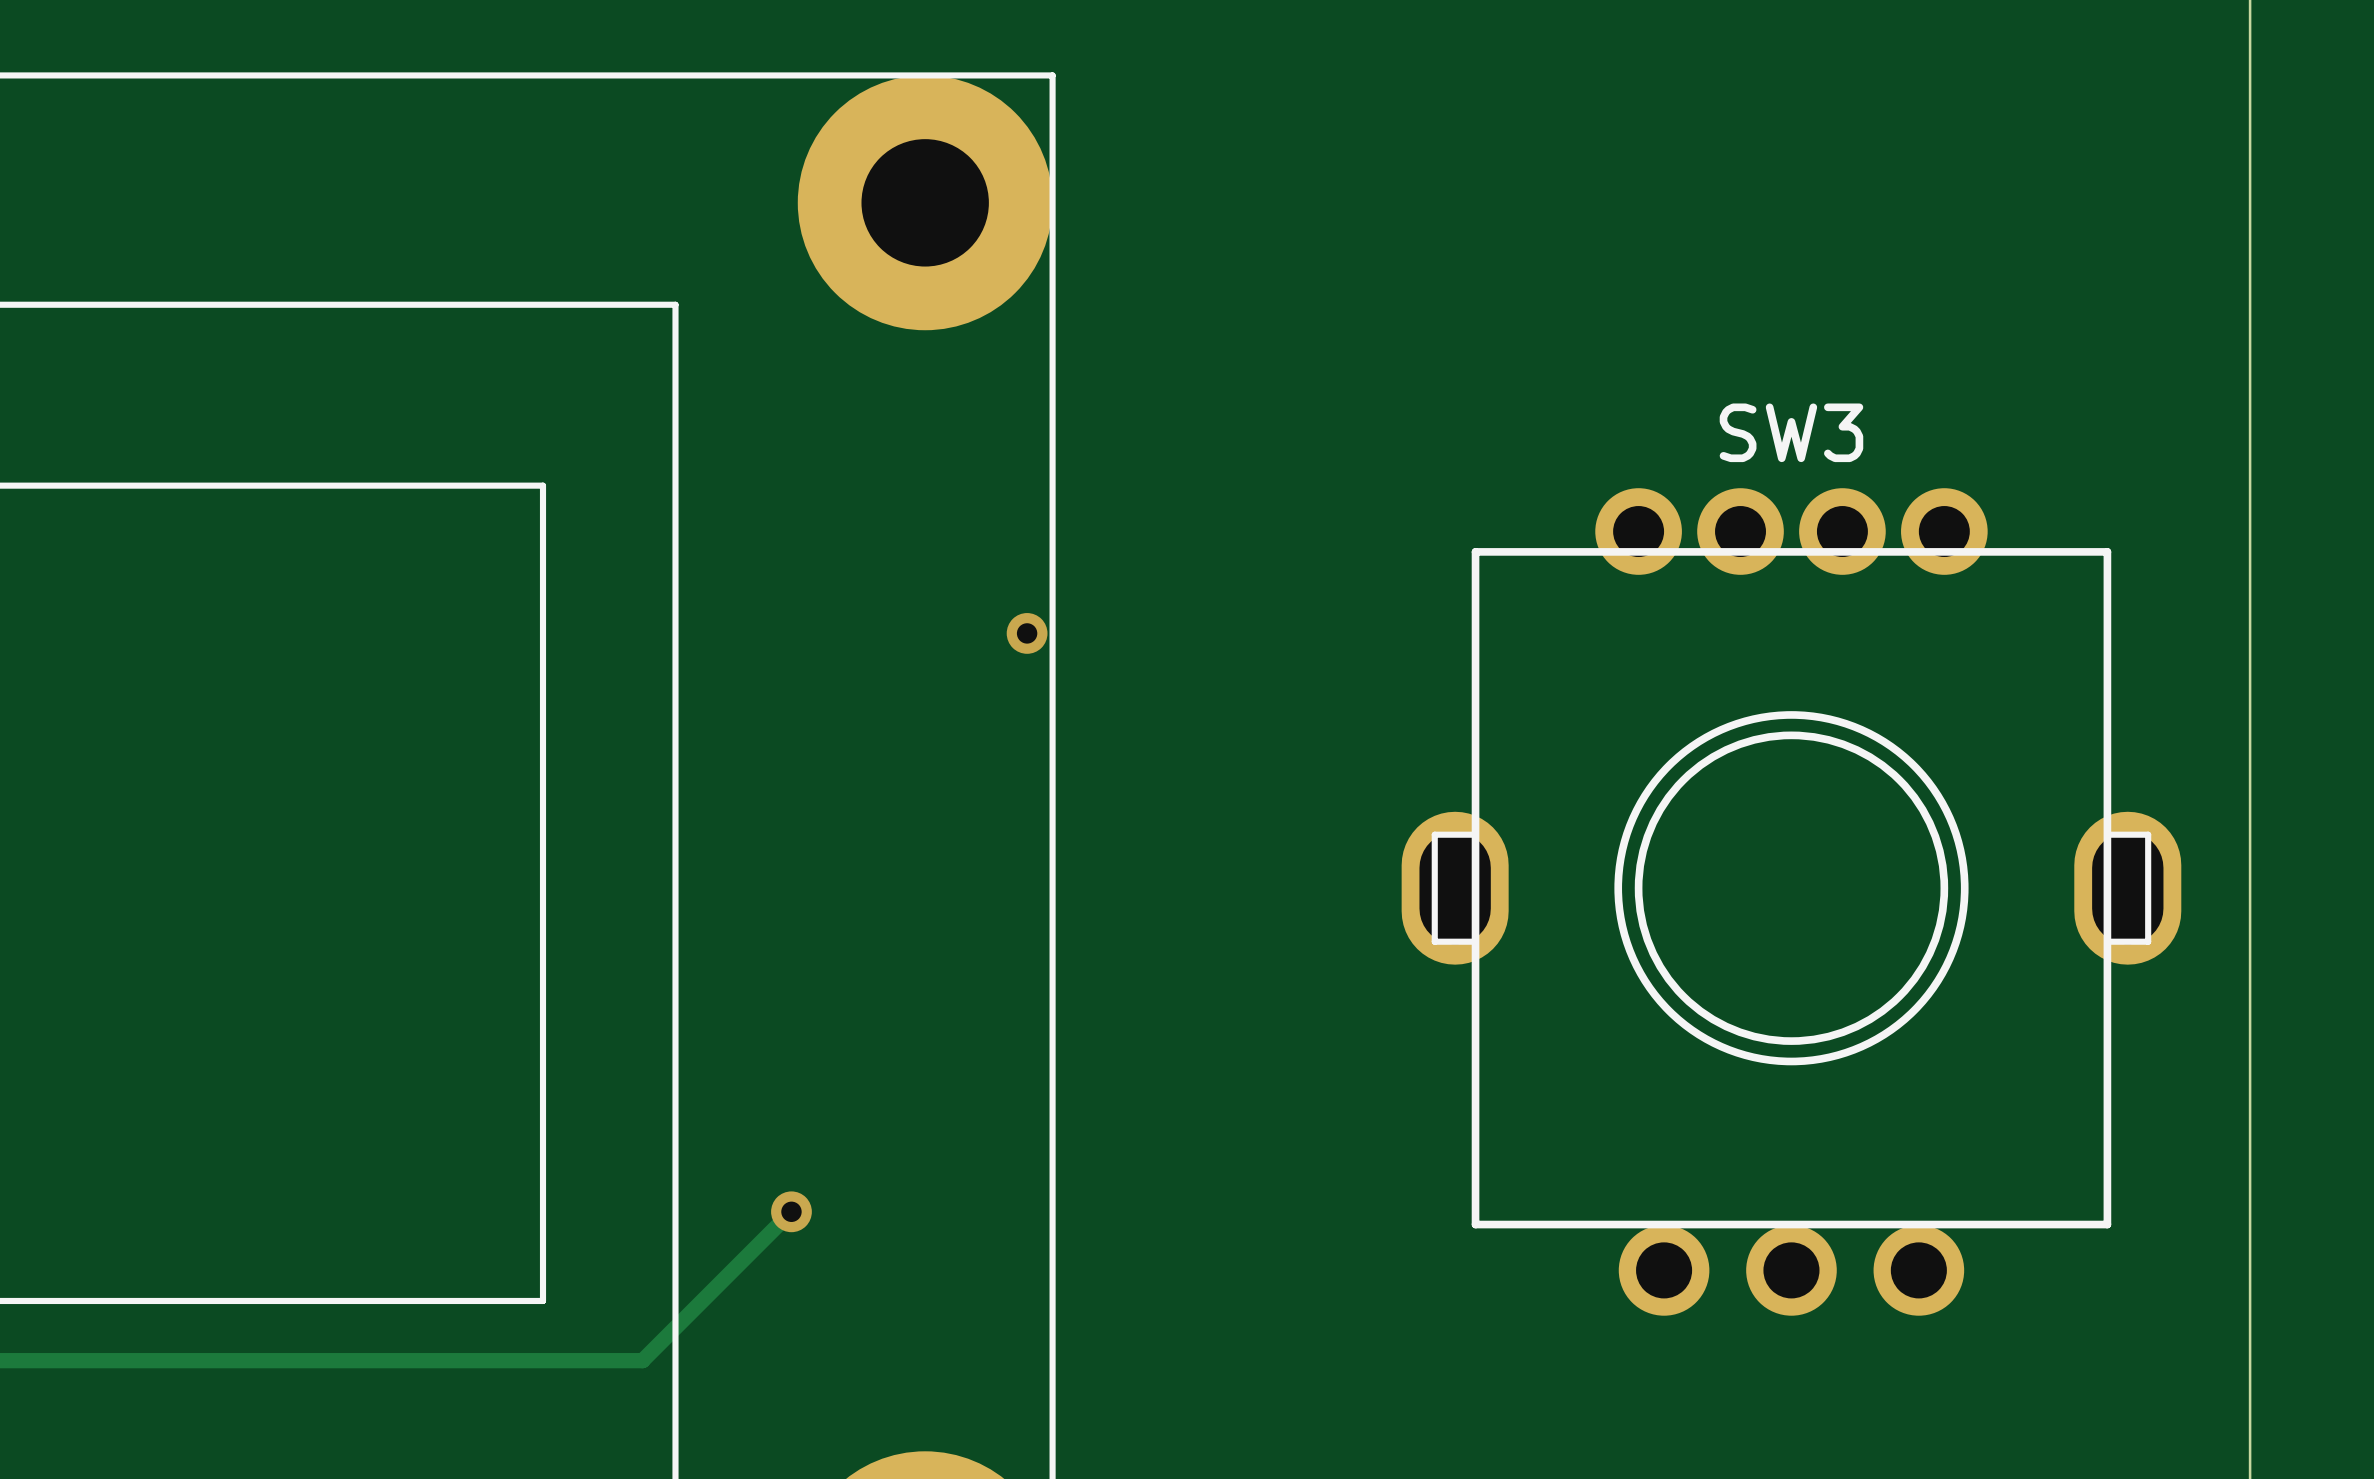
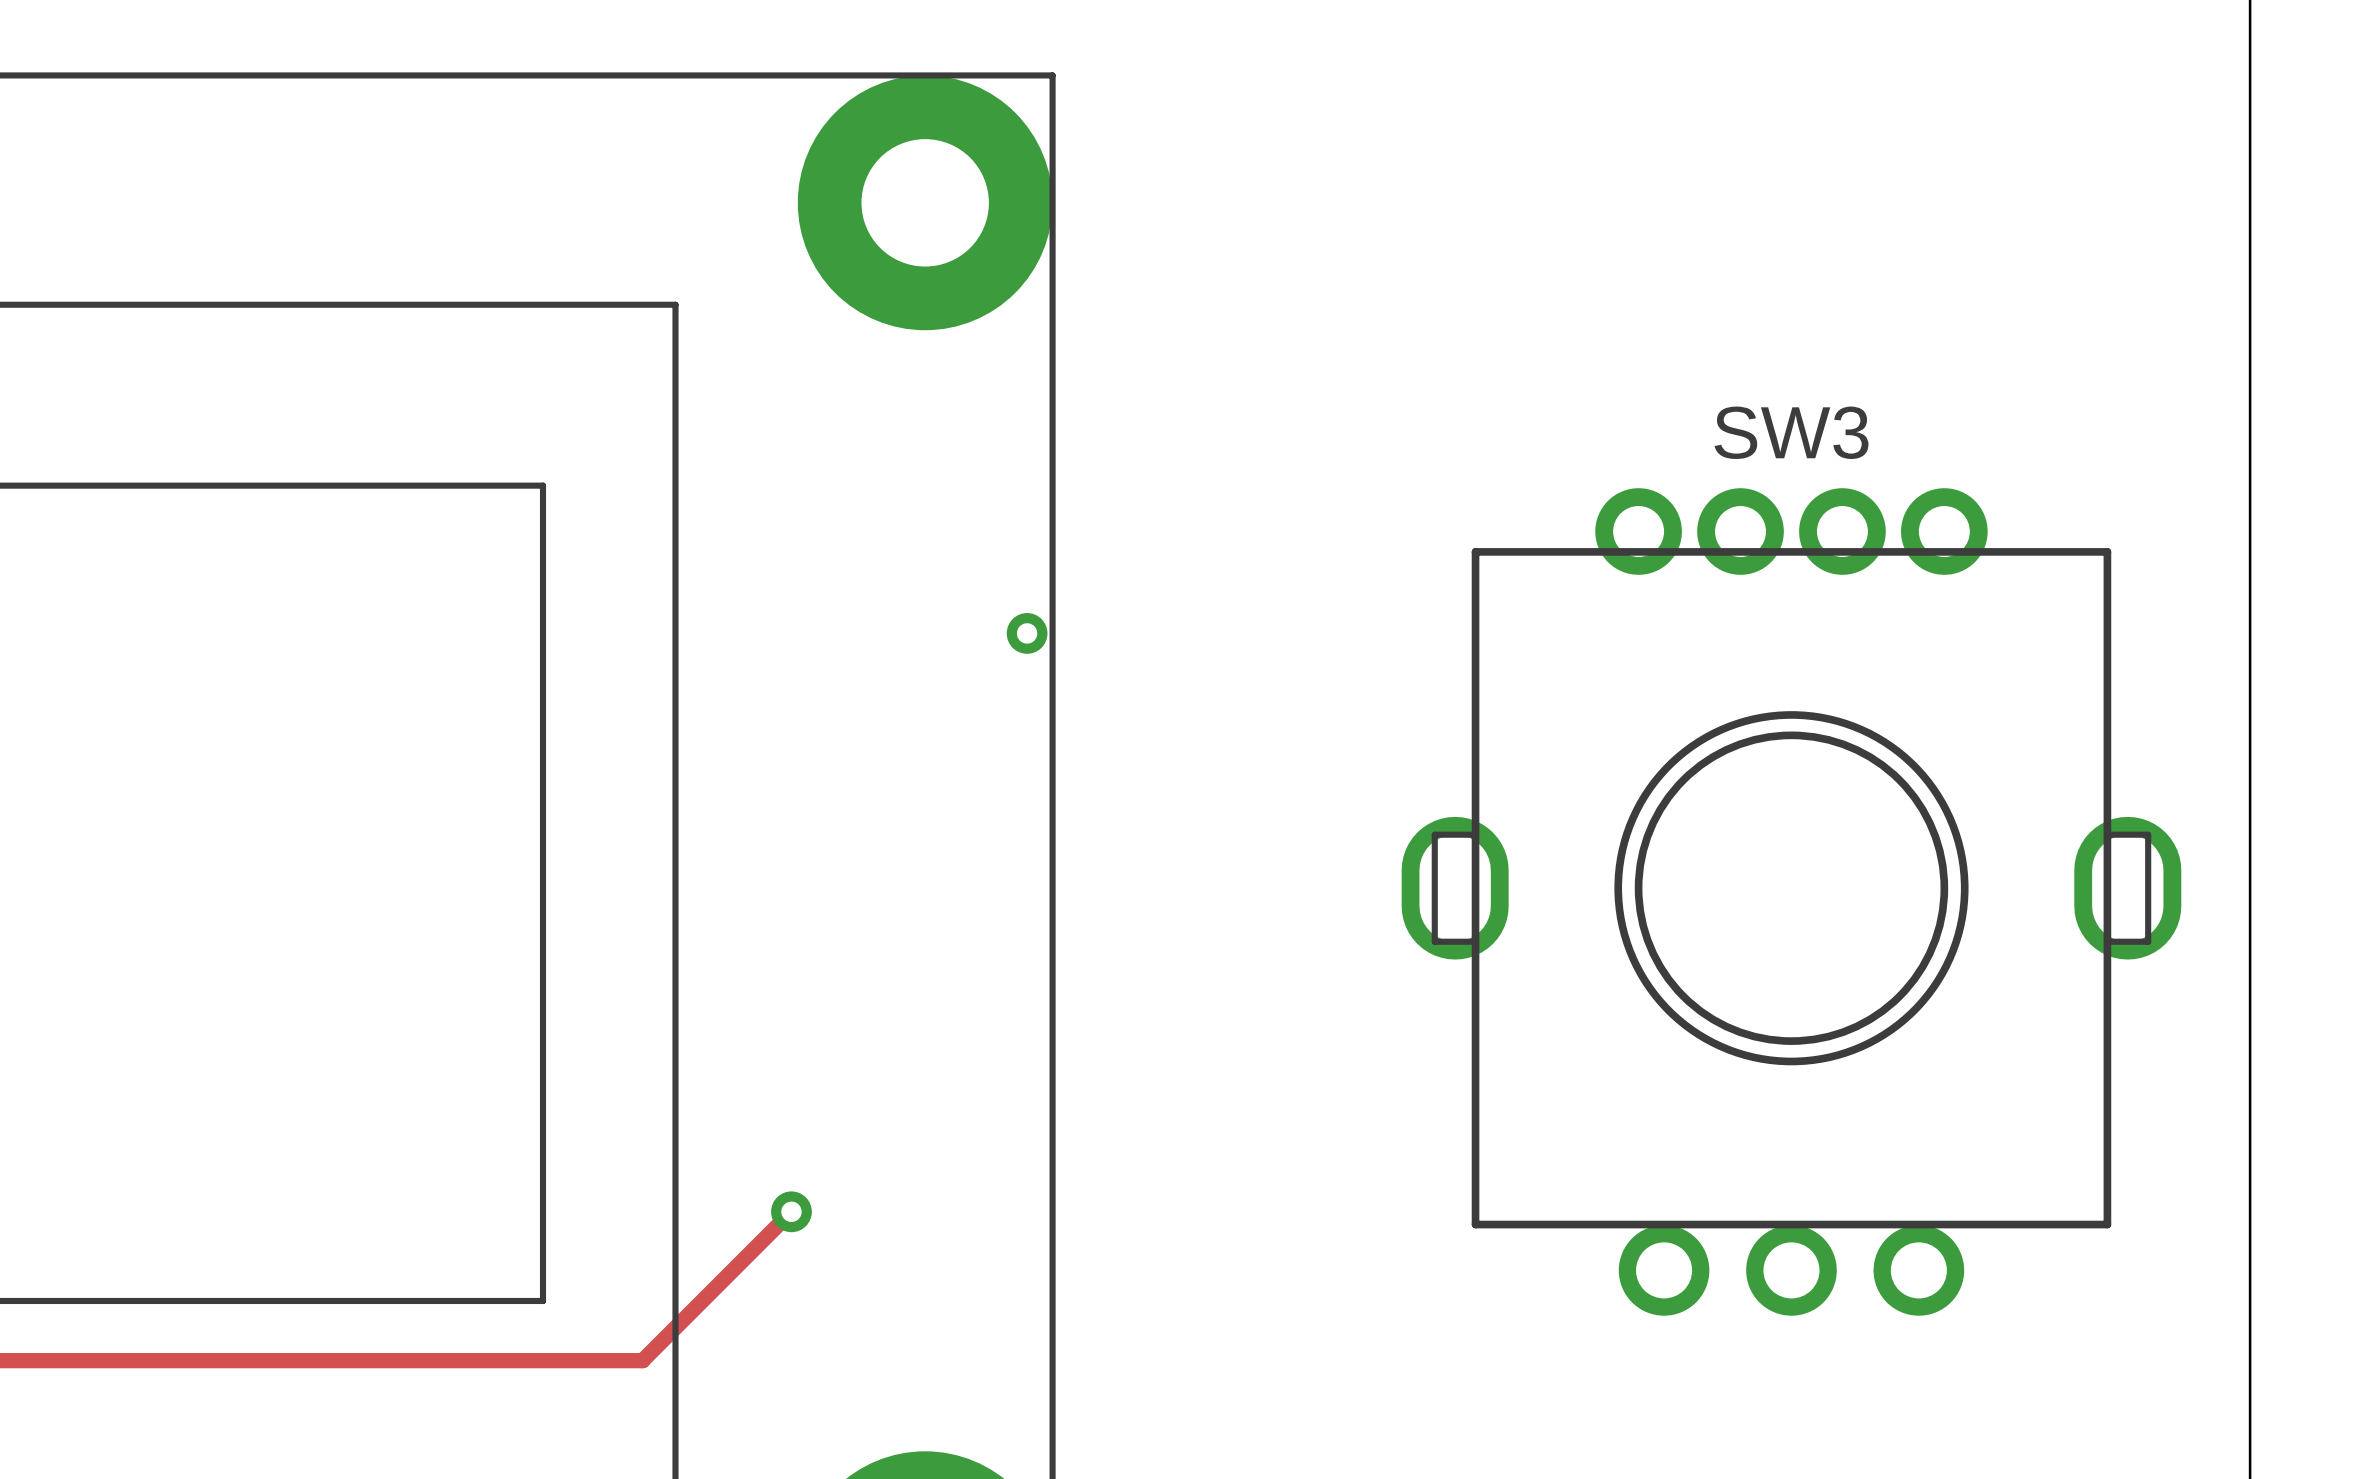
SW3 footprint: [1401, 488, 2182, 1316] -> [1401, 488, 2182, 1316]

